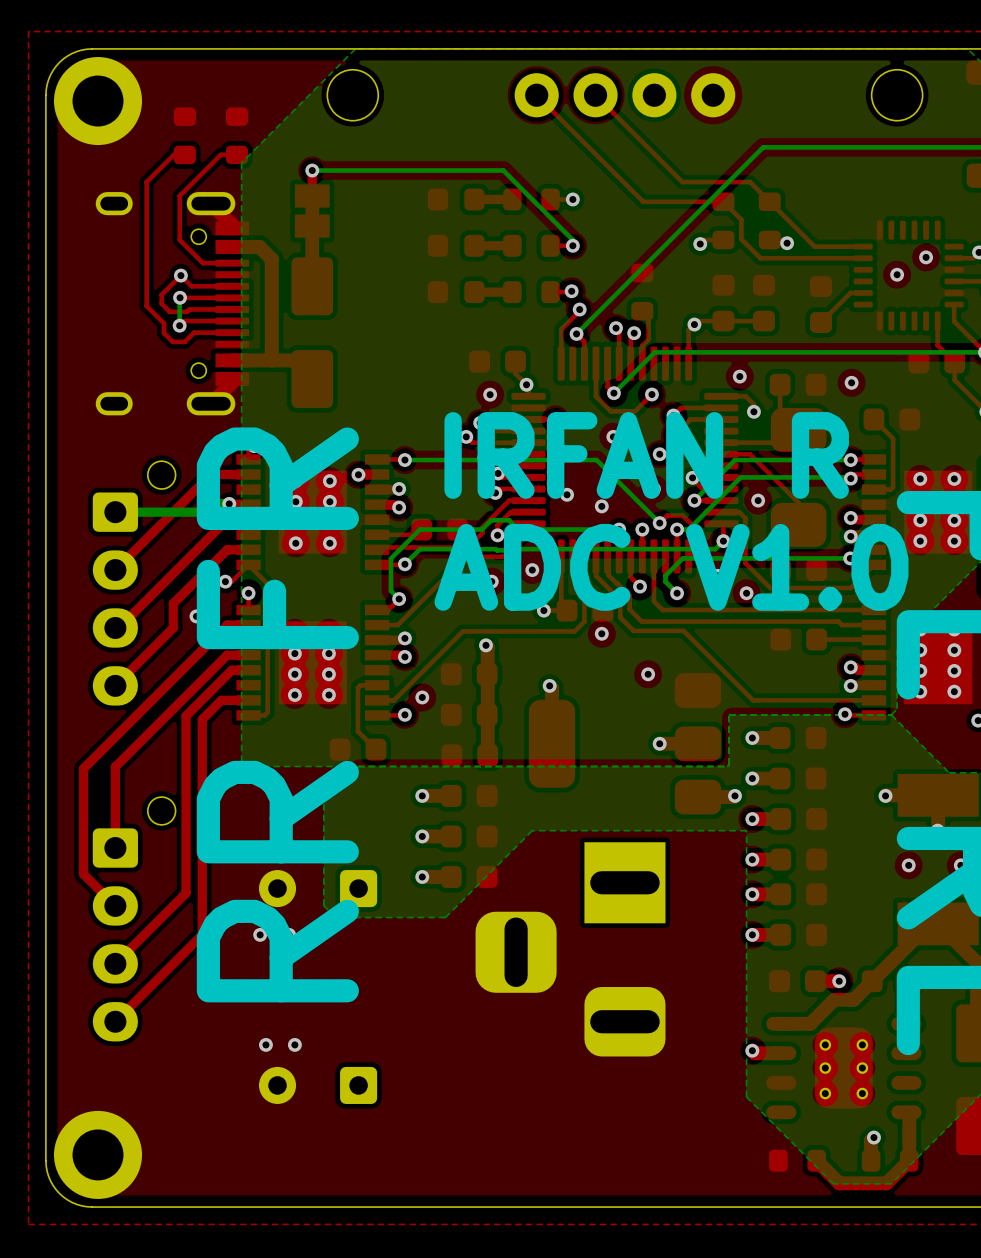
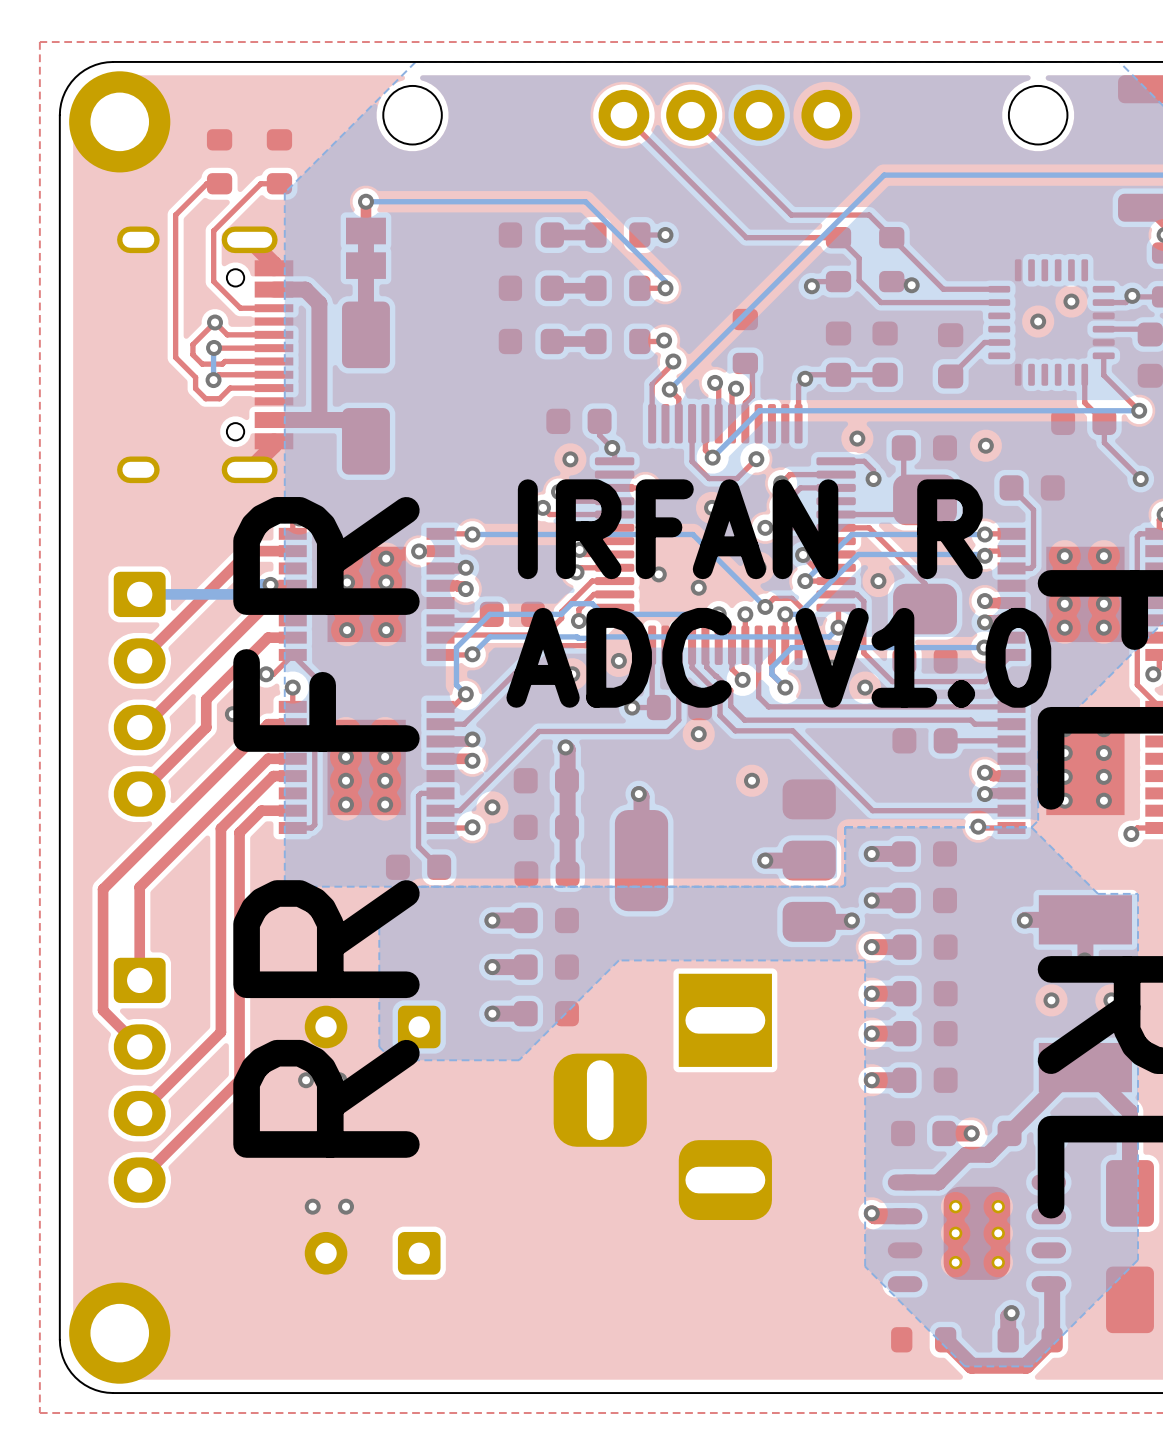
part: (134, 583) -> none
part: (134, 919) -> none

